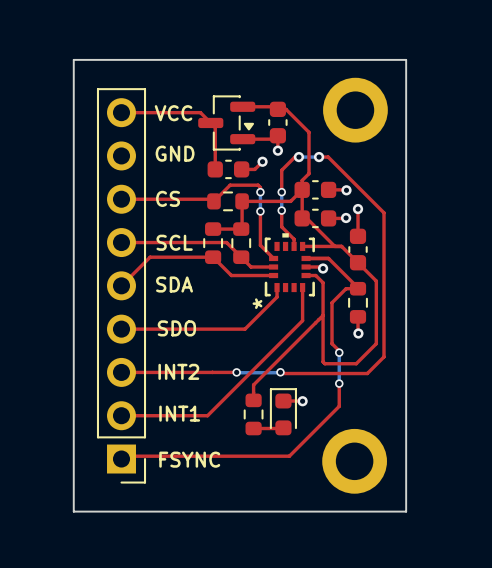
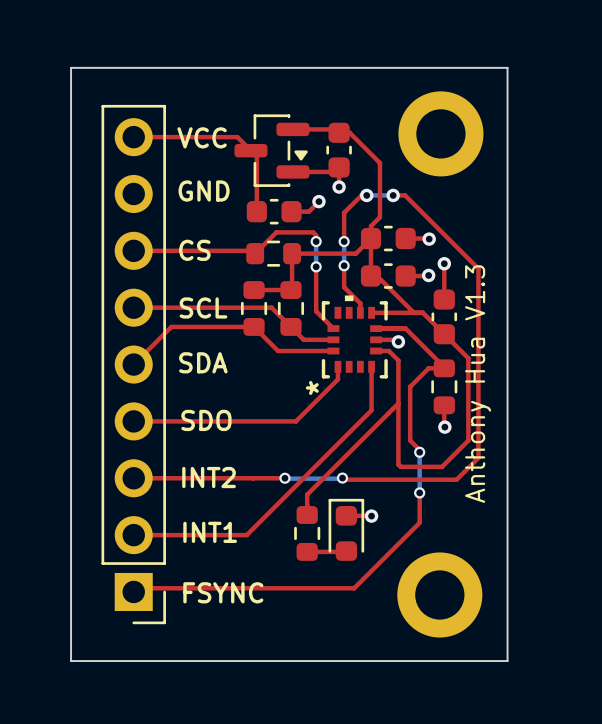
text: none -> Anthony Hua V1.3 (478, 384)

